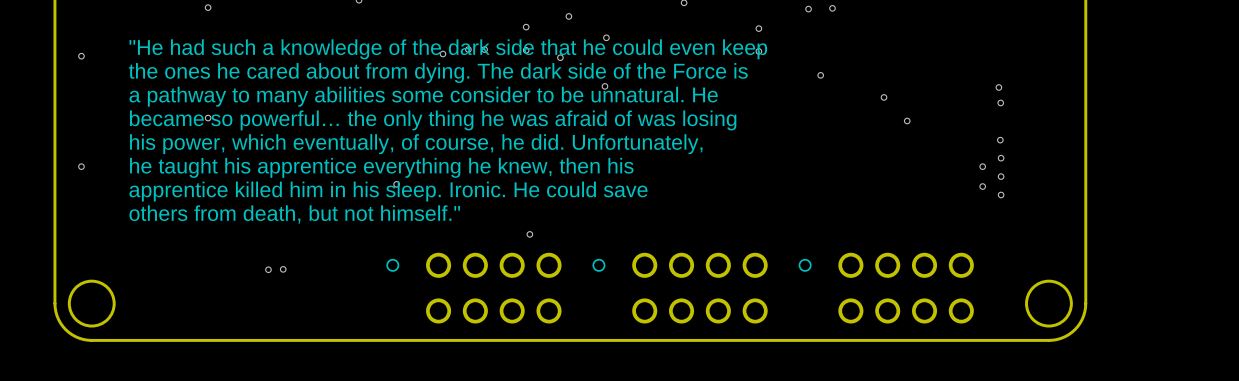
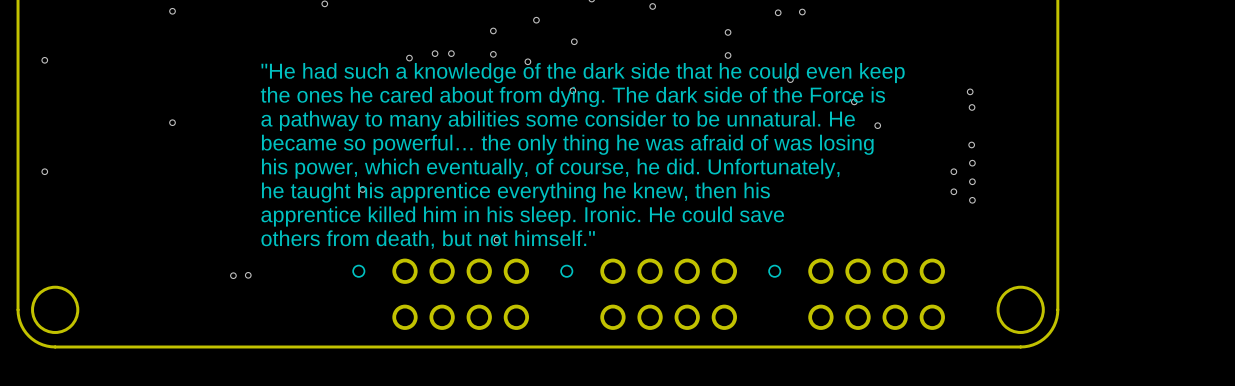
text position: "He had such a knowledge of the dark side that he could even keep (448, 49) -> "He had such a knowledge of the dark side that he could even keep (583, 73)
text position: the ones he cared about from dying. The dark side of the Force is (438, 73) -> the ones he cared about from dying. The dark side of the Force is (572, 96)
text position: a pathway to many abilities some consider to be unnatural. He (423, 96) -> a pathway to many abilities some consider to be unnatural. He (558, 120)
text position: became so powerful… the only thing he was afraid of was losing (433, 120) -> became so powerful… the only thing he was afraid of was losing (567, 144)
text position: his power, which eventually, of course, he did. Unfortunately, (416, 144) -> his power, which eventually, of course, he did. Unfortunately, (550, 168)
text position: he taught his apprentice everything he knew, then his (381, 167) -> he taught his apprentice everything he knew, then his (515, 192)
text position: apprentice killed him in his sleep. Ironic. He could save (388, 191) -> apprentice killed him in his sleep. Ironic. He could save (522, 216)
text position: others from death, but not himself." (294, 214) -> others from death, but not himself." (428, 239)

